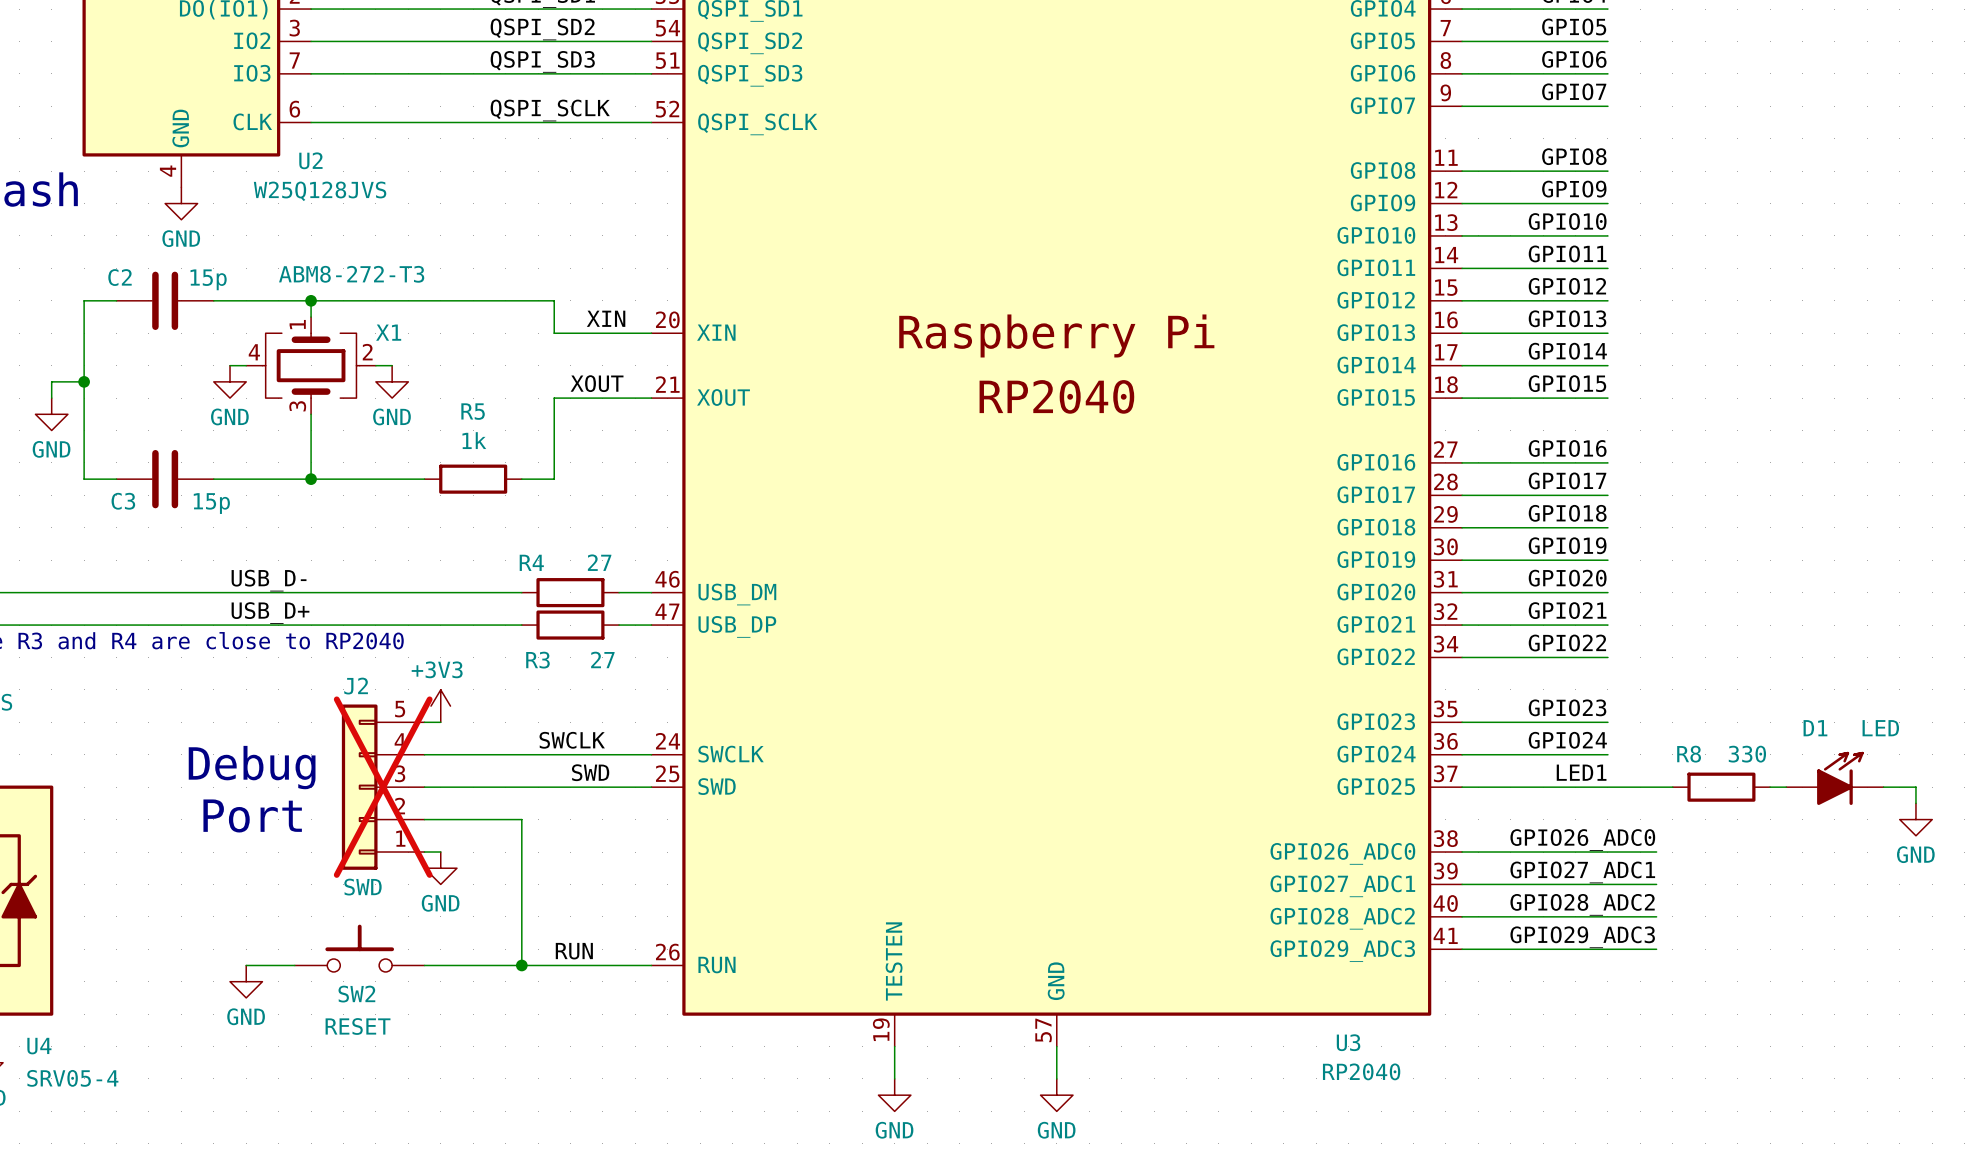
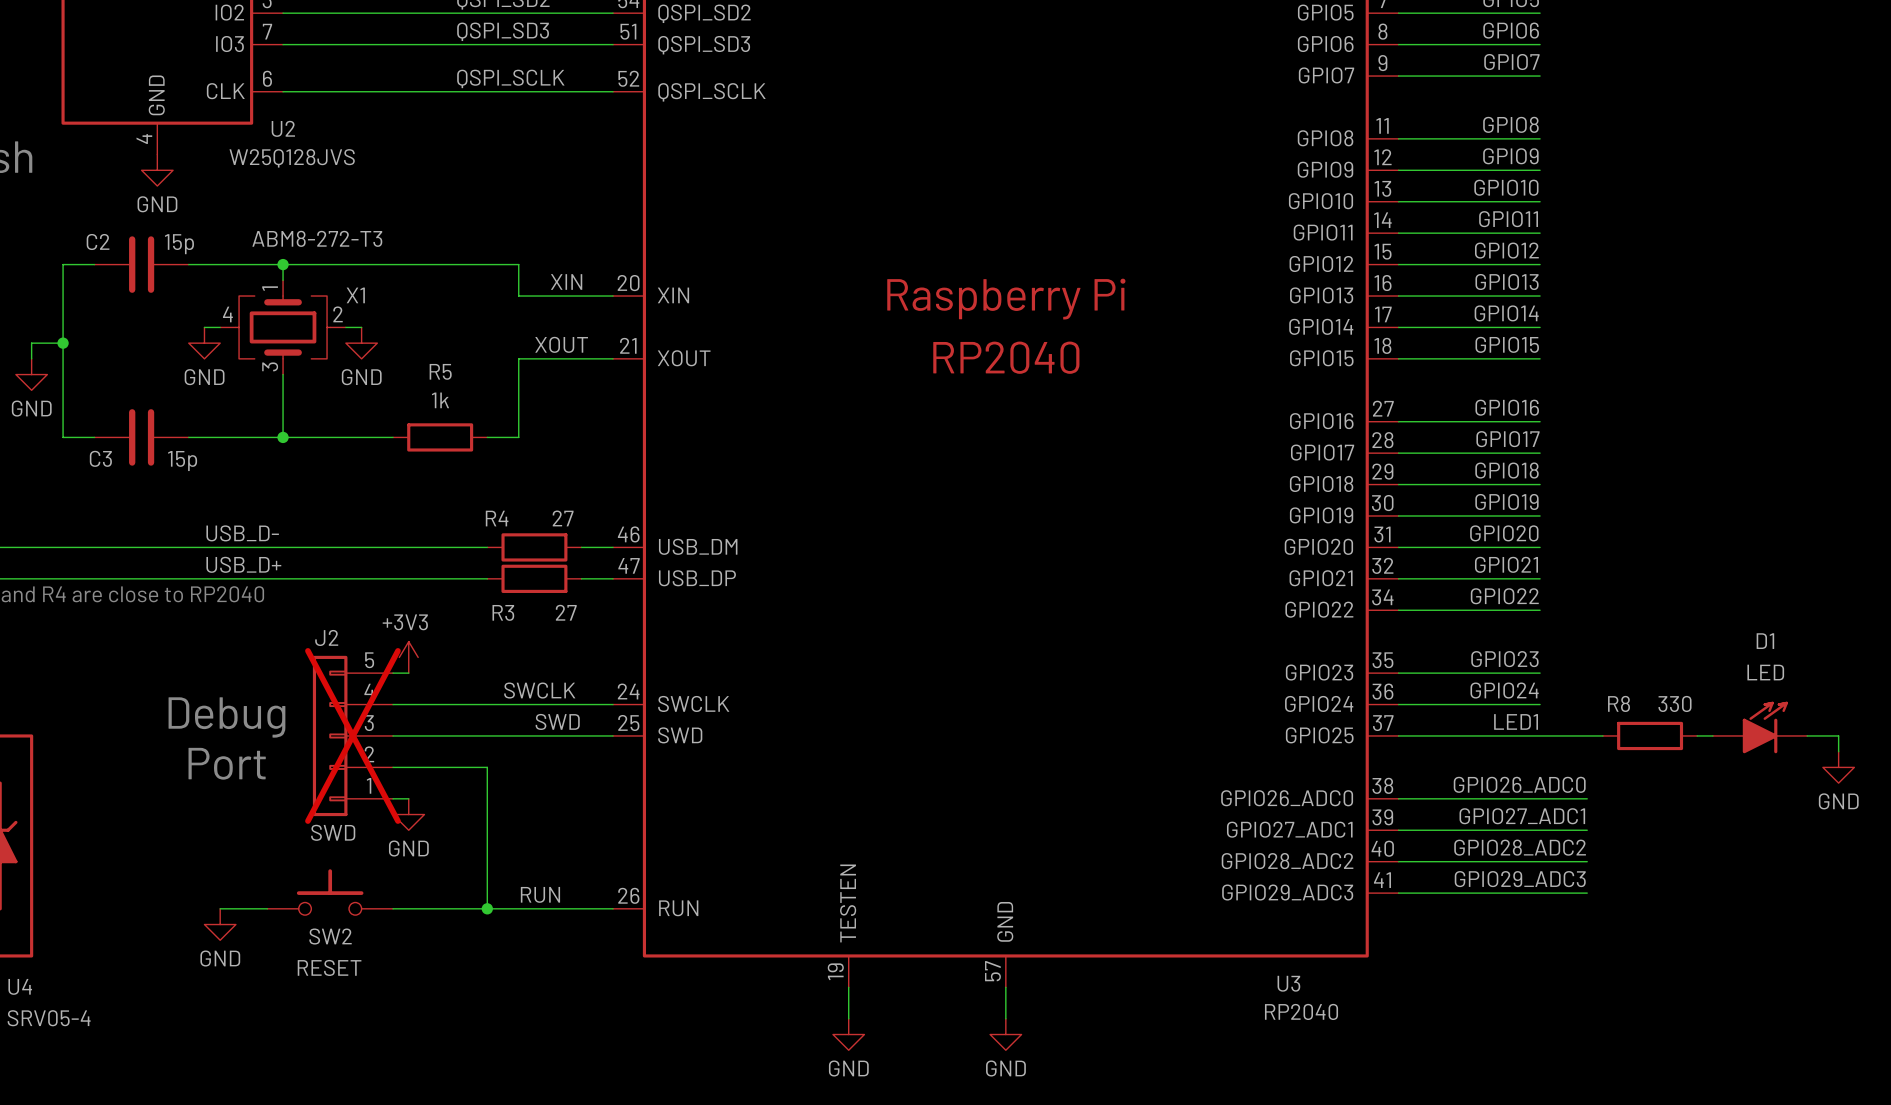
D1 name position: D1 (1815, 728) -> D1 (1765, 641)
D1 value position: LED (1880, 728) -> LED (1765, 672)

